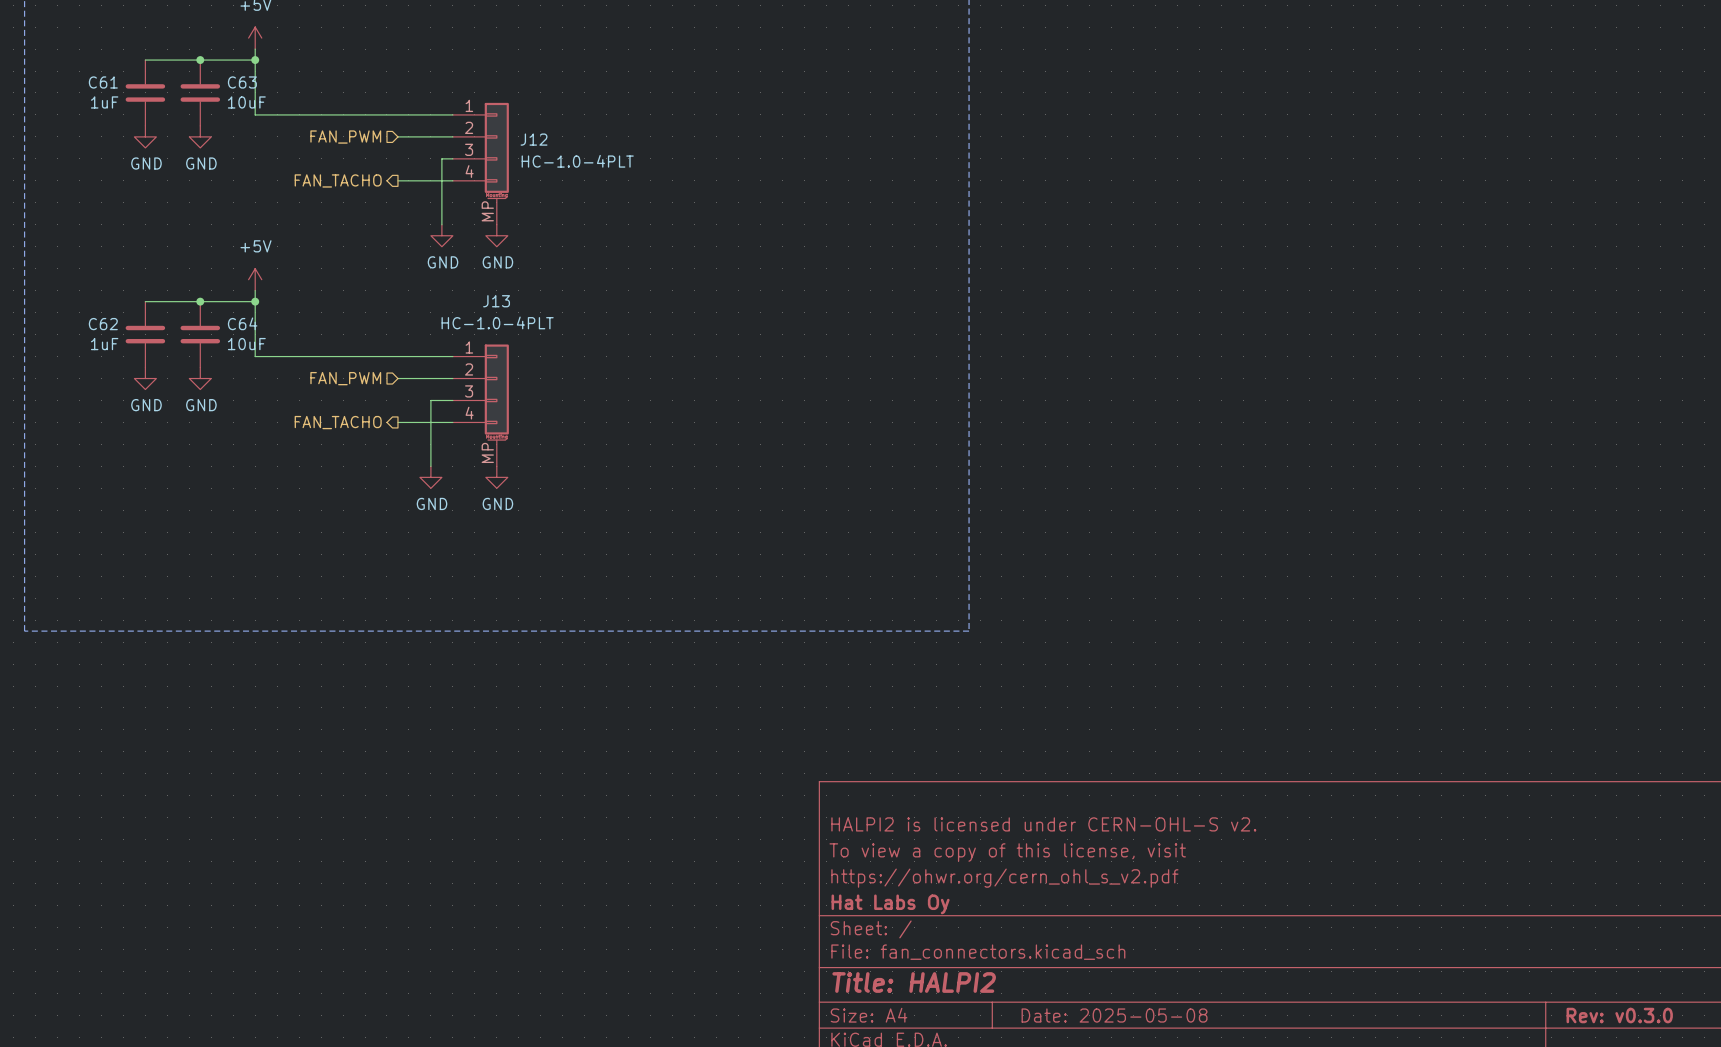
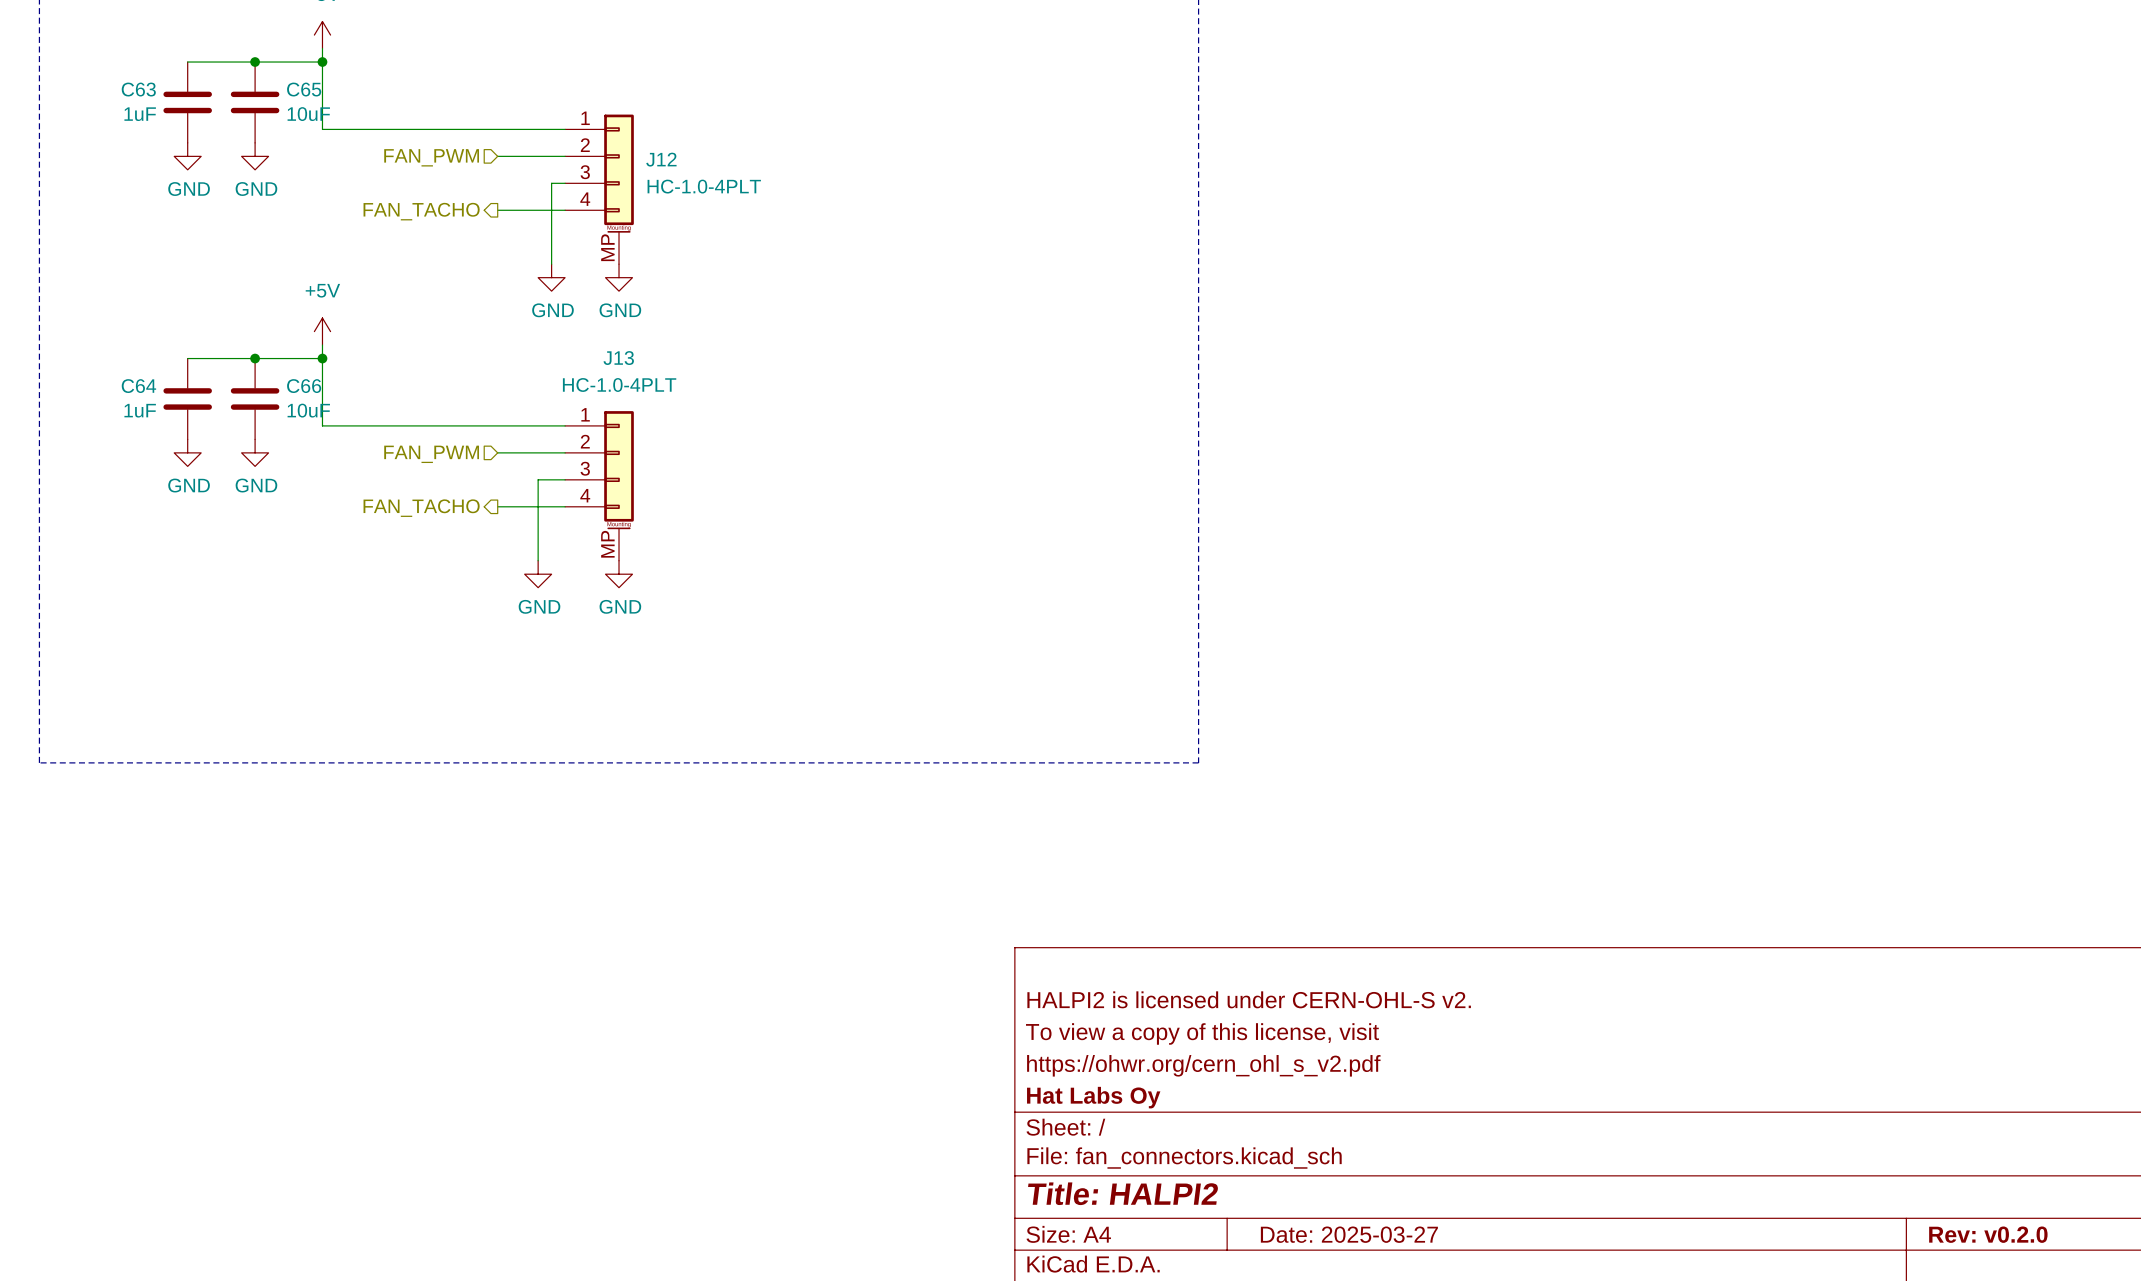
C61 name: C61 (103, 82) -> C63 (138, 89)
C63 name: C63 (242, 82) -> C65 (304, 89)
C64 name: C64 (242, 323) -> C66 (304, 386)
C62 name: C62 (103, 324) -> C64 (138, 386)
title block: Date: 2025-05-08 (1114, 1015) -> Date: 2025-03-27 (1349, 1234)
title block: Rev: v0.3.0 (1619, 1015) -> Rev: v0.2.0 (1988, 1234)

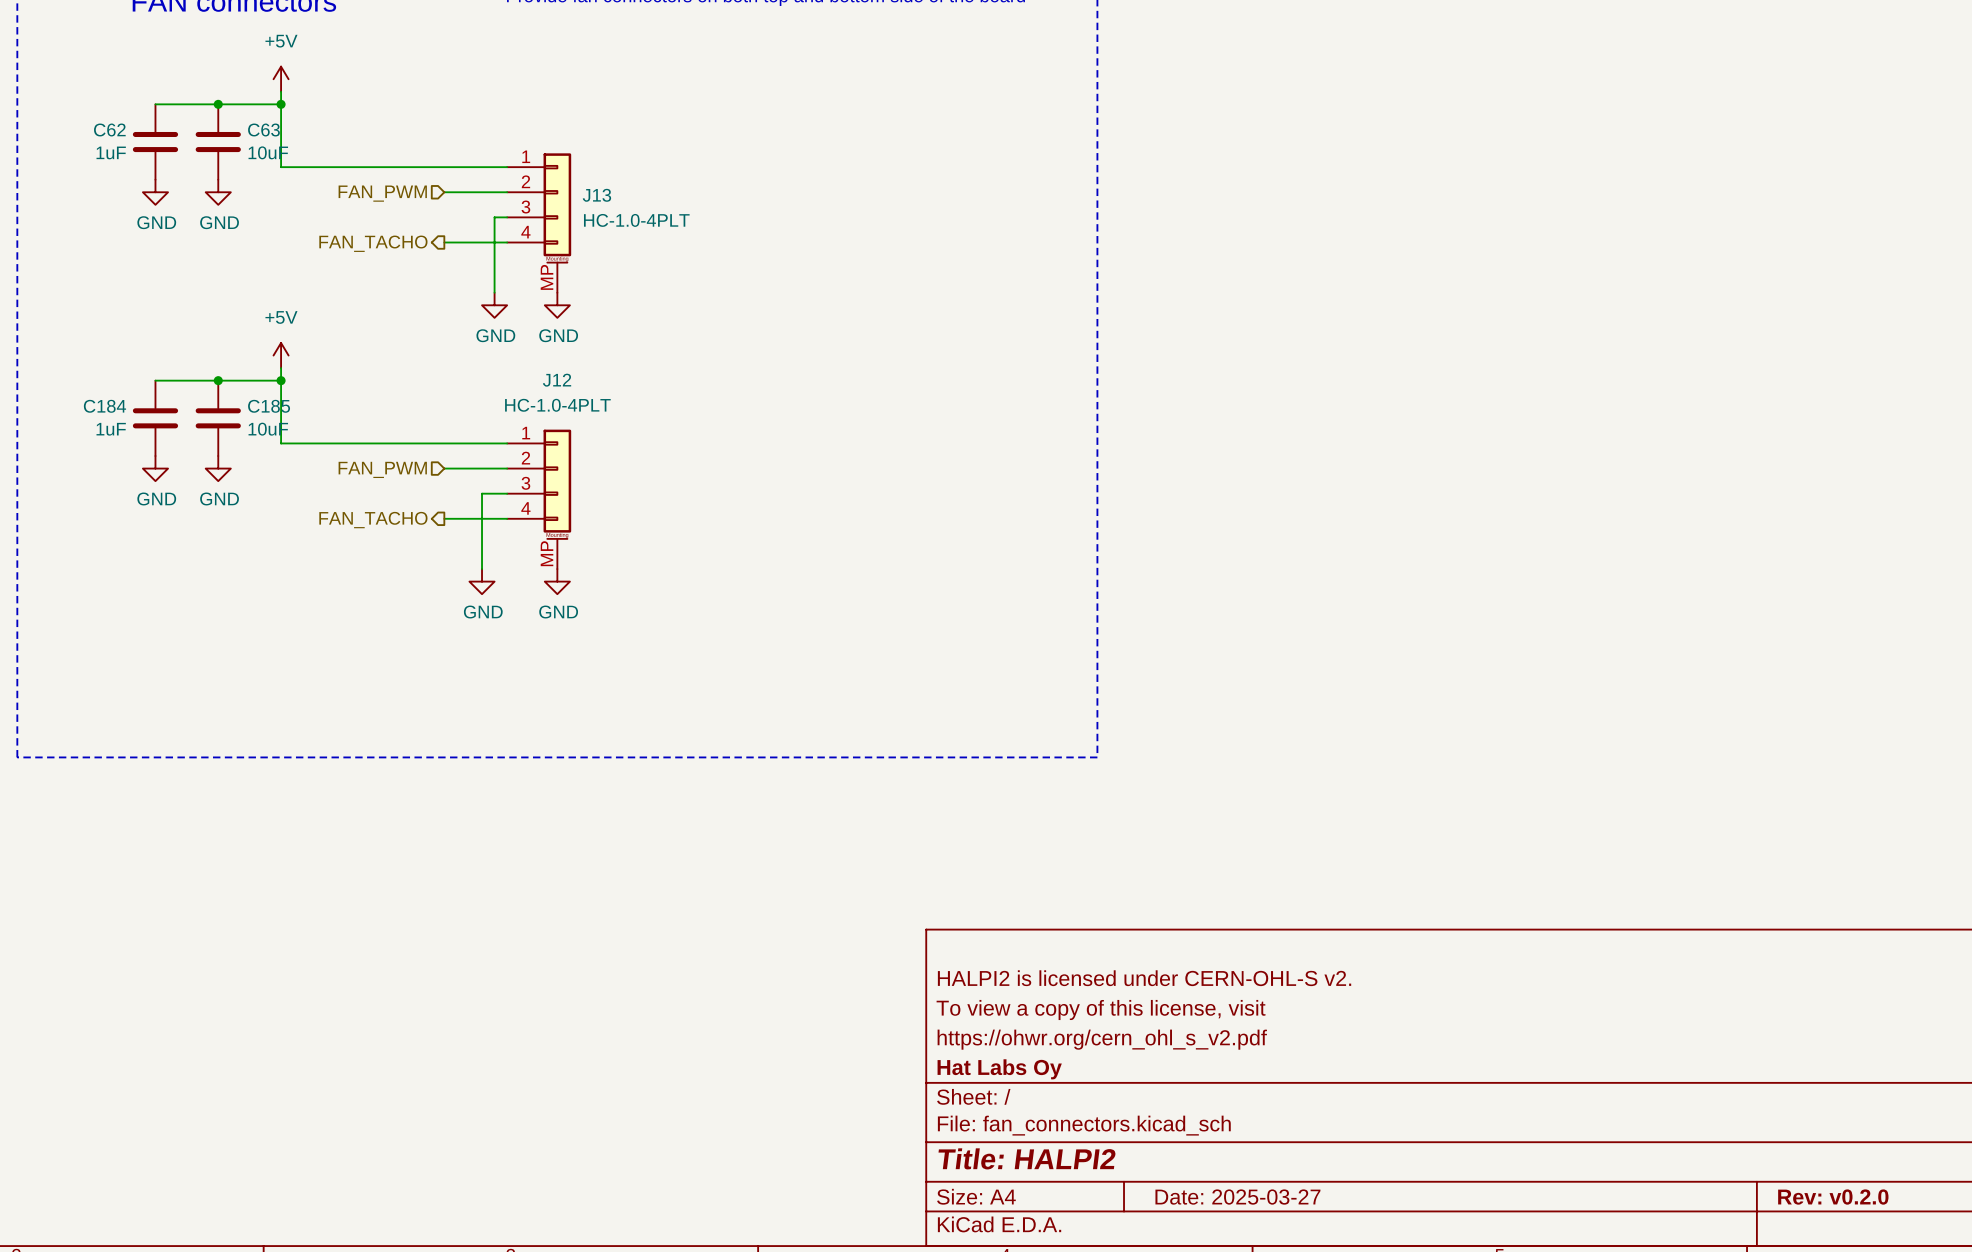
C63 name: C63 (138, 89) -> C62 (109, 130)
C65 name: C65 (304, 89) -> C63 (263, 130)
J12 name: J12 (661, 159) -> J13 (596, 195)
J13 name: J13 (618, 358) -> J12 (557, 380)
C64 name: C64 (138, 386) -> C184 (104, 406)
C66 name: C66 (304, 386) -> C185 (269, 406)

